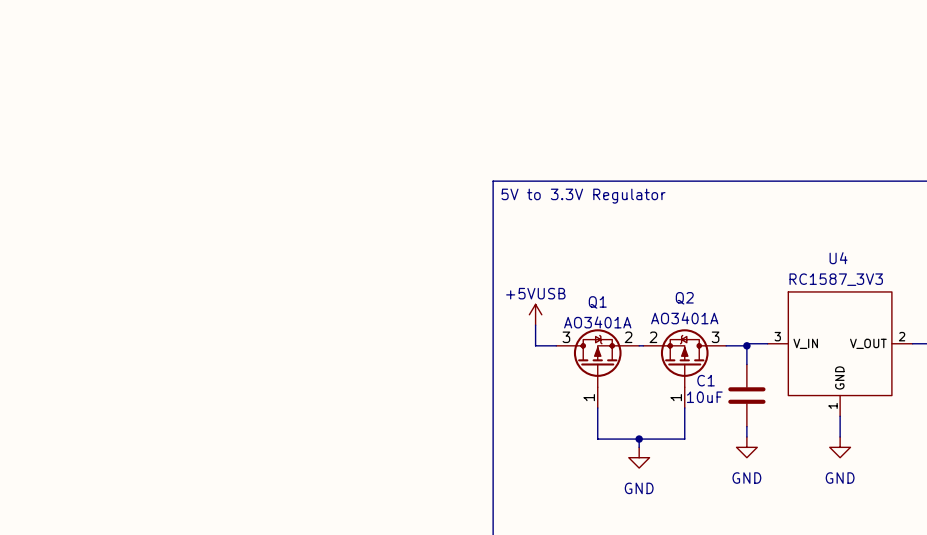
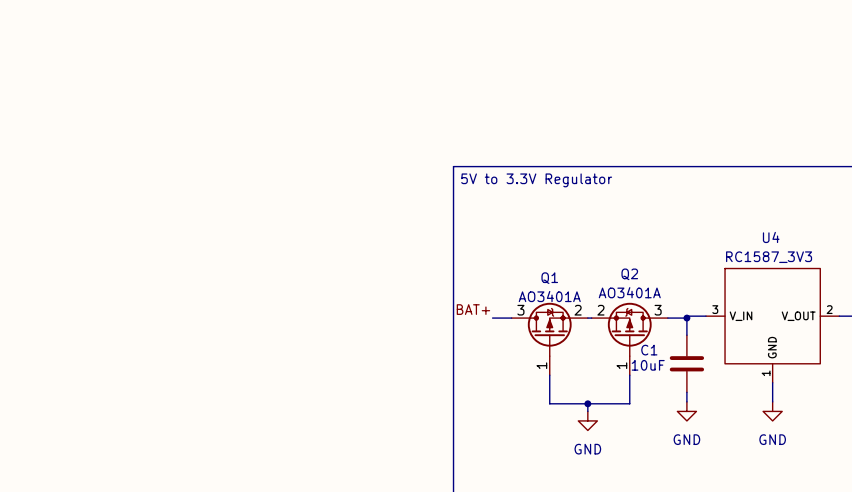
power symbol: +5VUSB (535, 314) -> none
wire: (535, 325) (535, 345) -> none
label: none -> BAT+ (473, 309)

